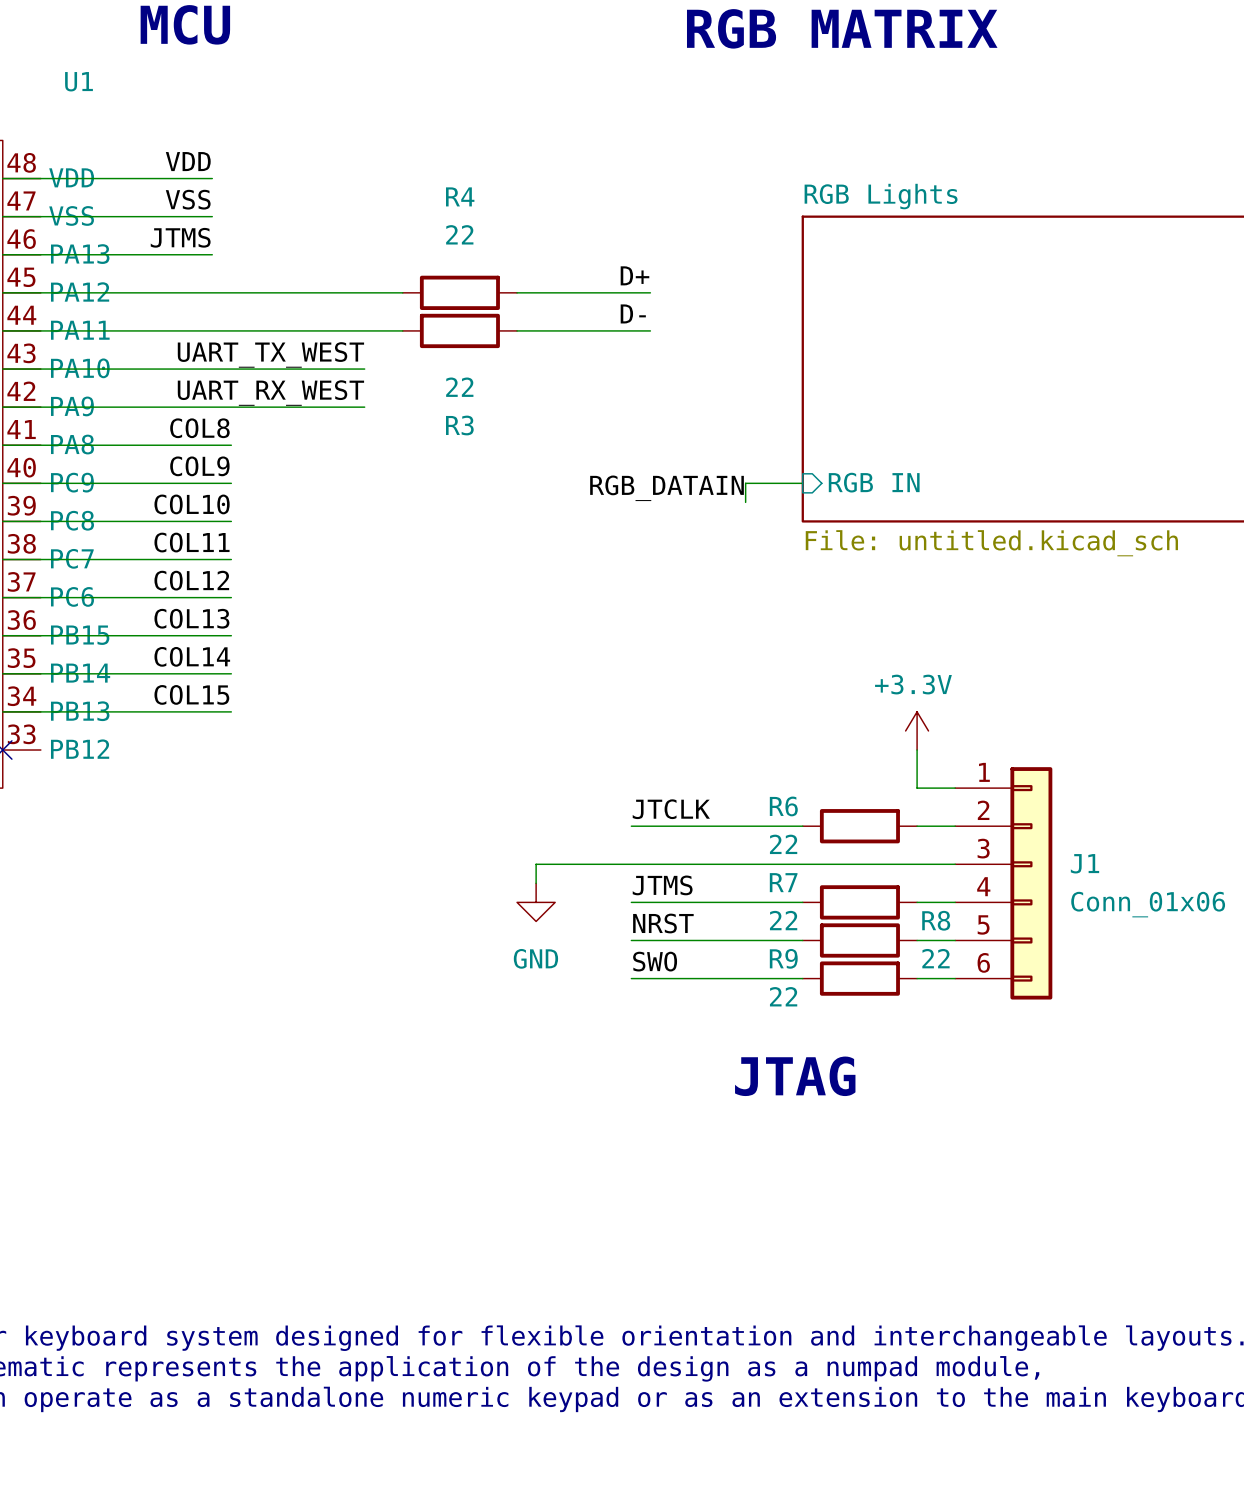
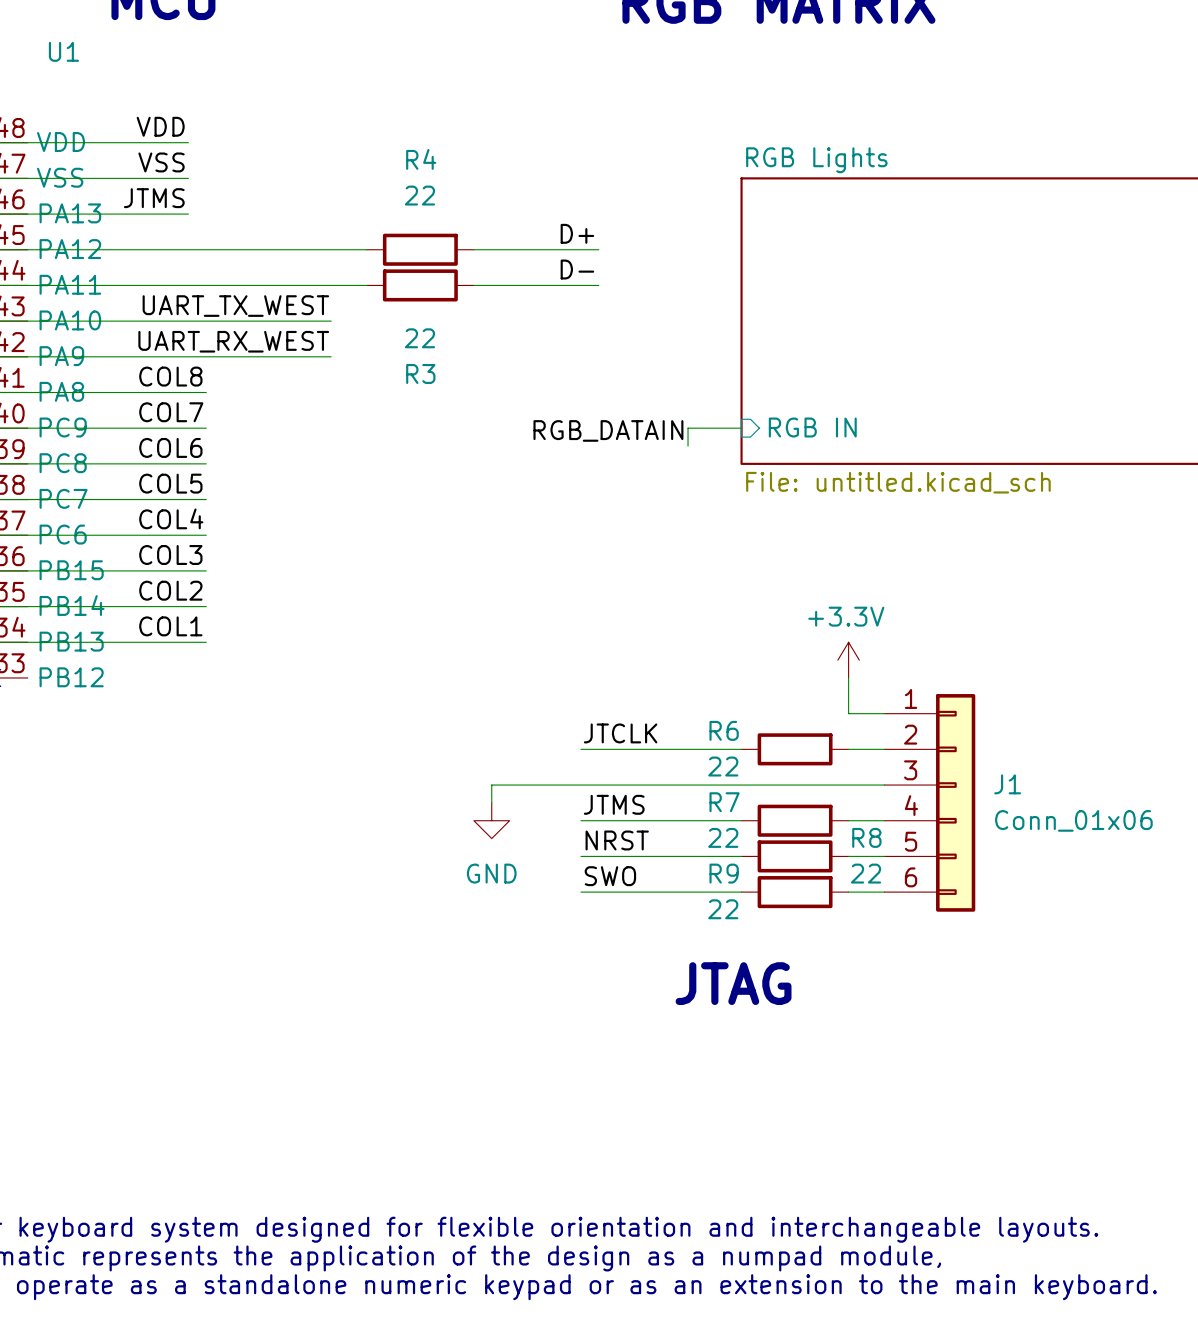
label: COL9 (199, 466) -> COL7 (171, 412)
label: COL10 (192, 504) -> COL6 (170, 447)
label: COL11 (192, 542) -> COL5 (170, 483)
label: COL12 (191, 580) -> COL4 (171, 518)
label: COL13 (191, 618) -> COL3 (170, 555)
label: COL14 (192, 656) -> COL2 (170, 590)
label: COL15 (191, 694) -> COL1 (170, 626)

